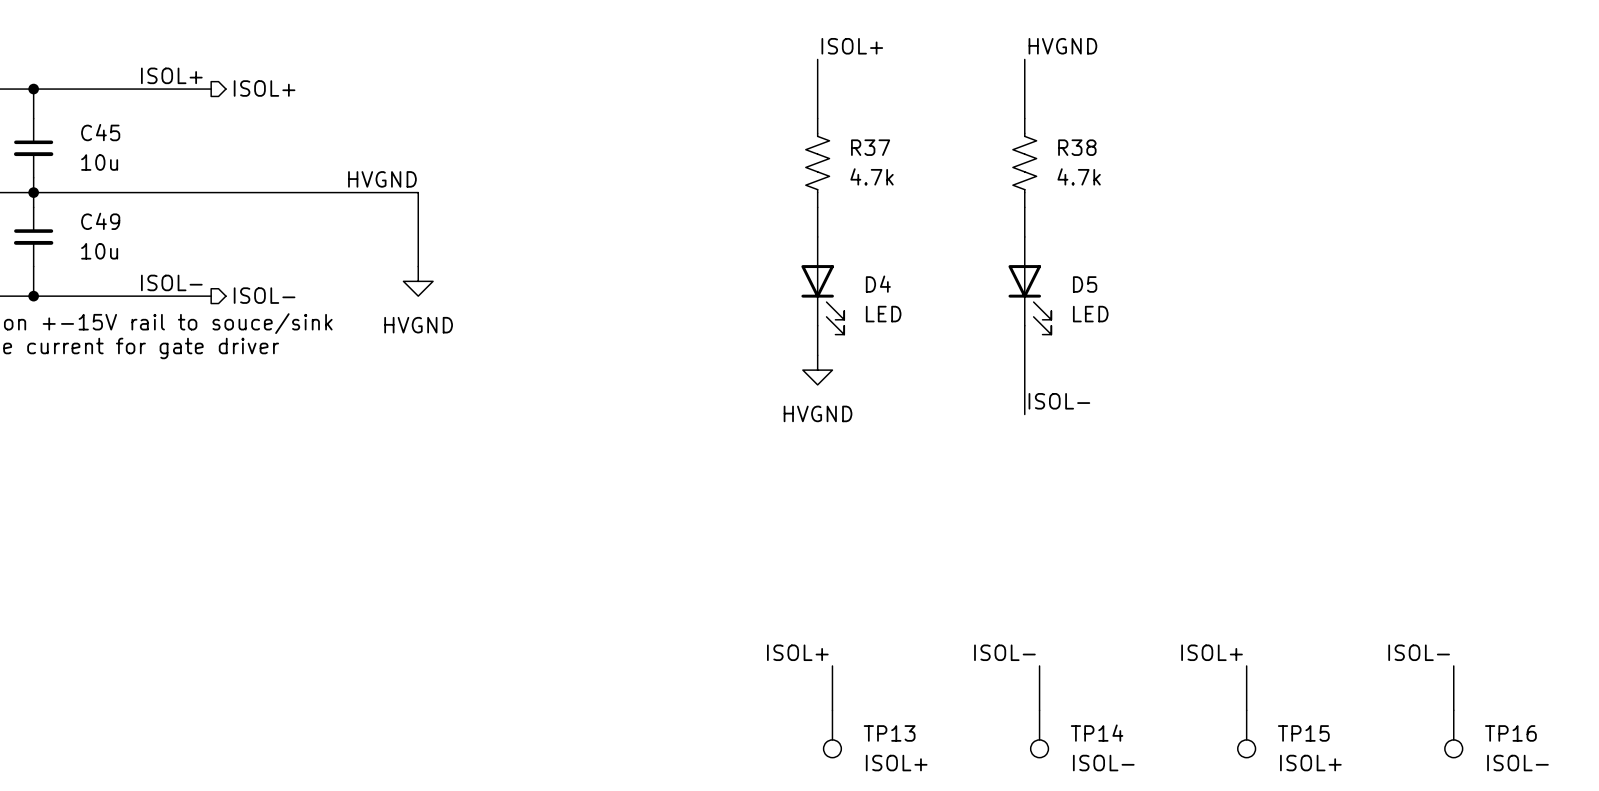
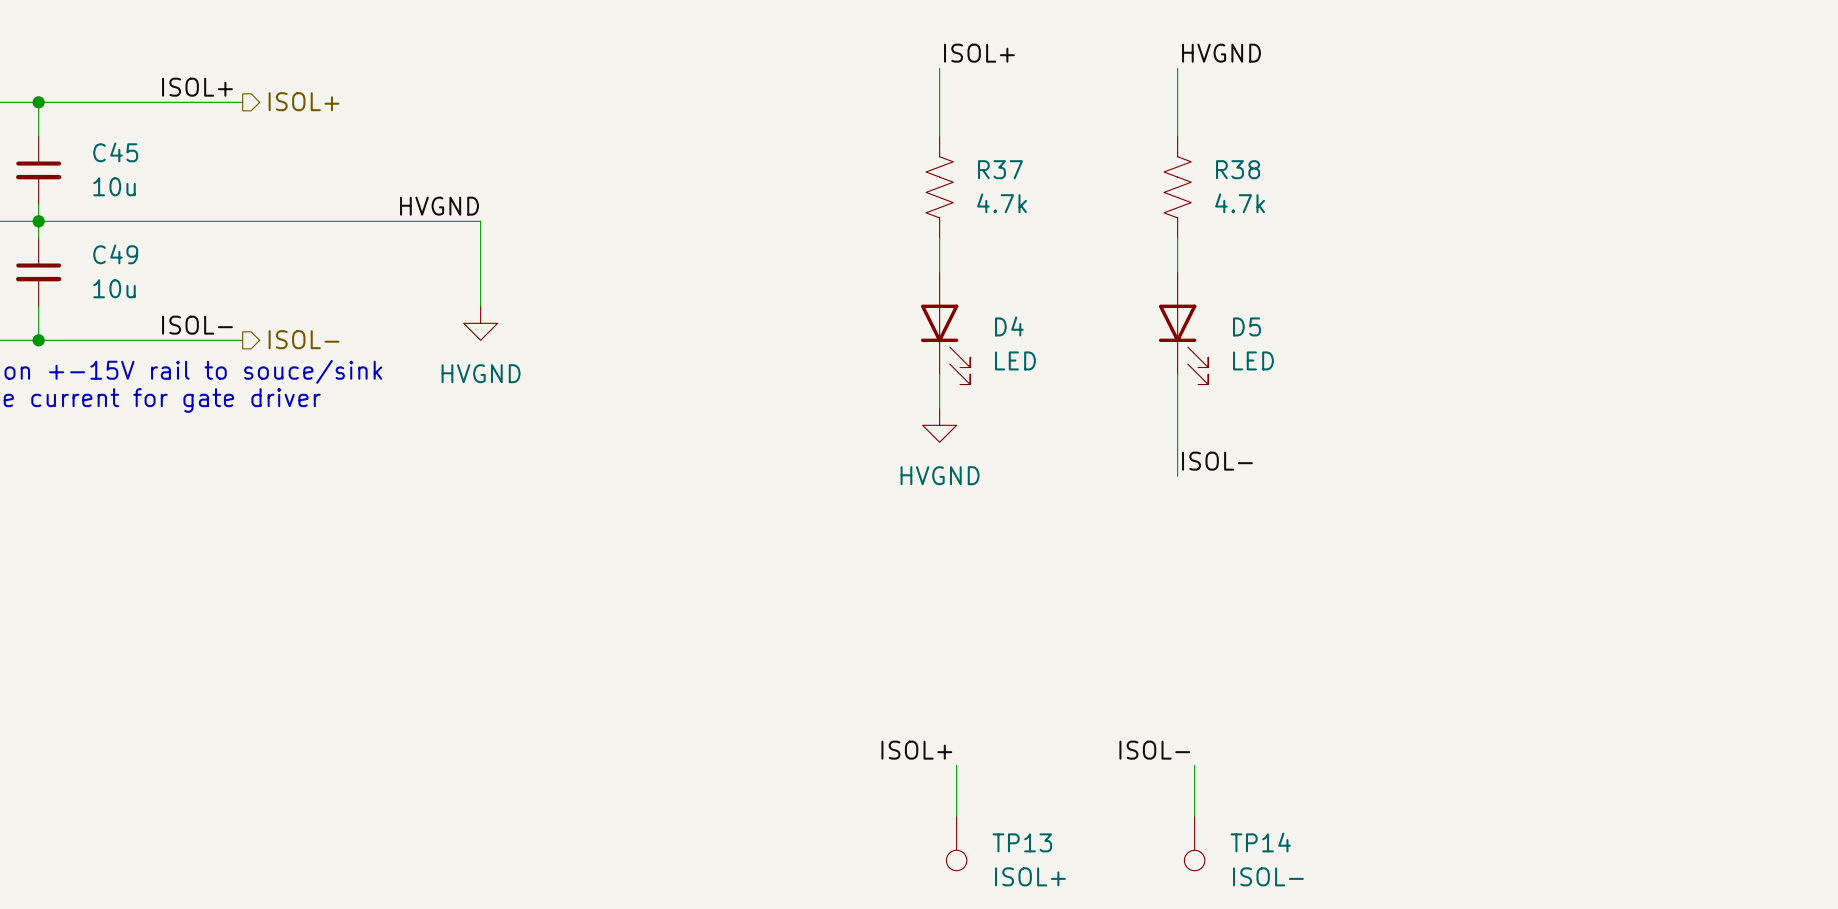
label: ISOL+ (1212, 652) -> none
label: ISOL- (1419, 652) -> none
wire: (1246, 665) (1246, 710) -> none
wire: (1453, 665) (1453, 710) -> none
TP15: ISOL+ (1246, 734) -> none
TP16: ISOL- (1453, 734) -> none

